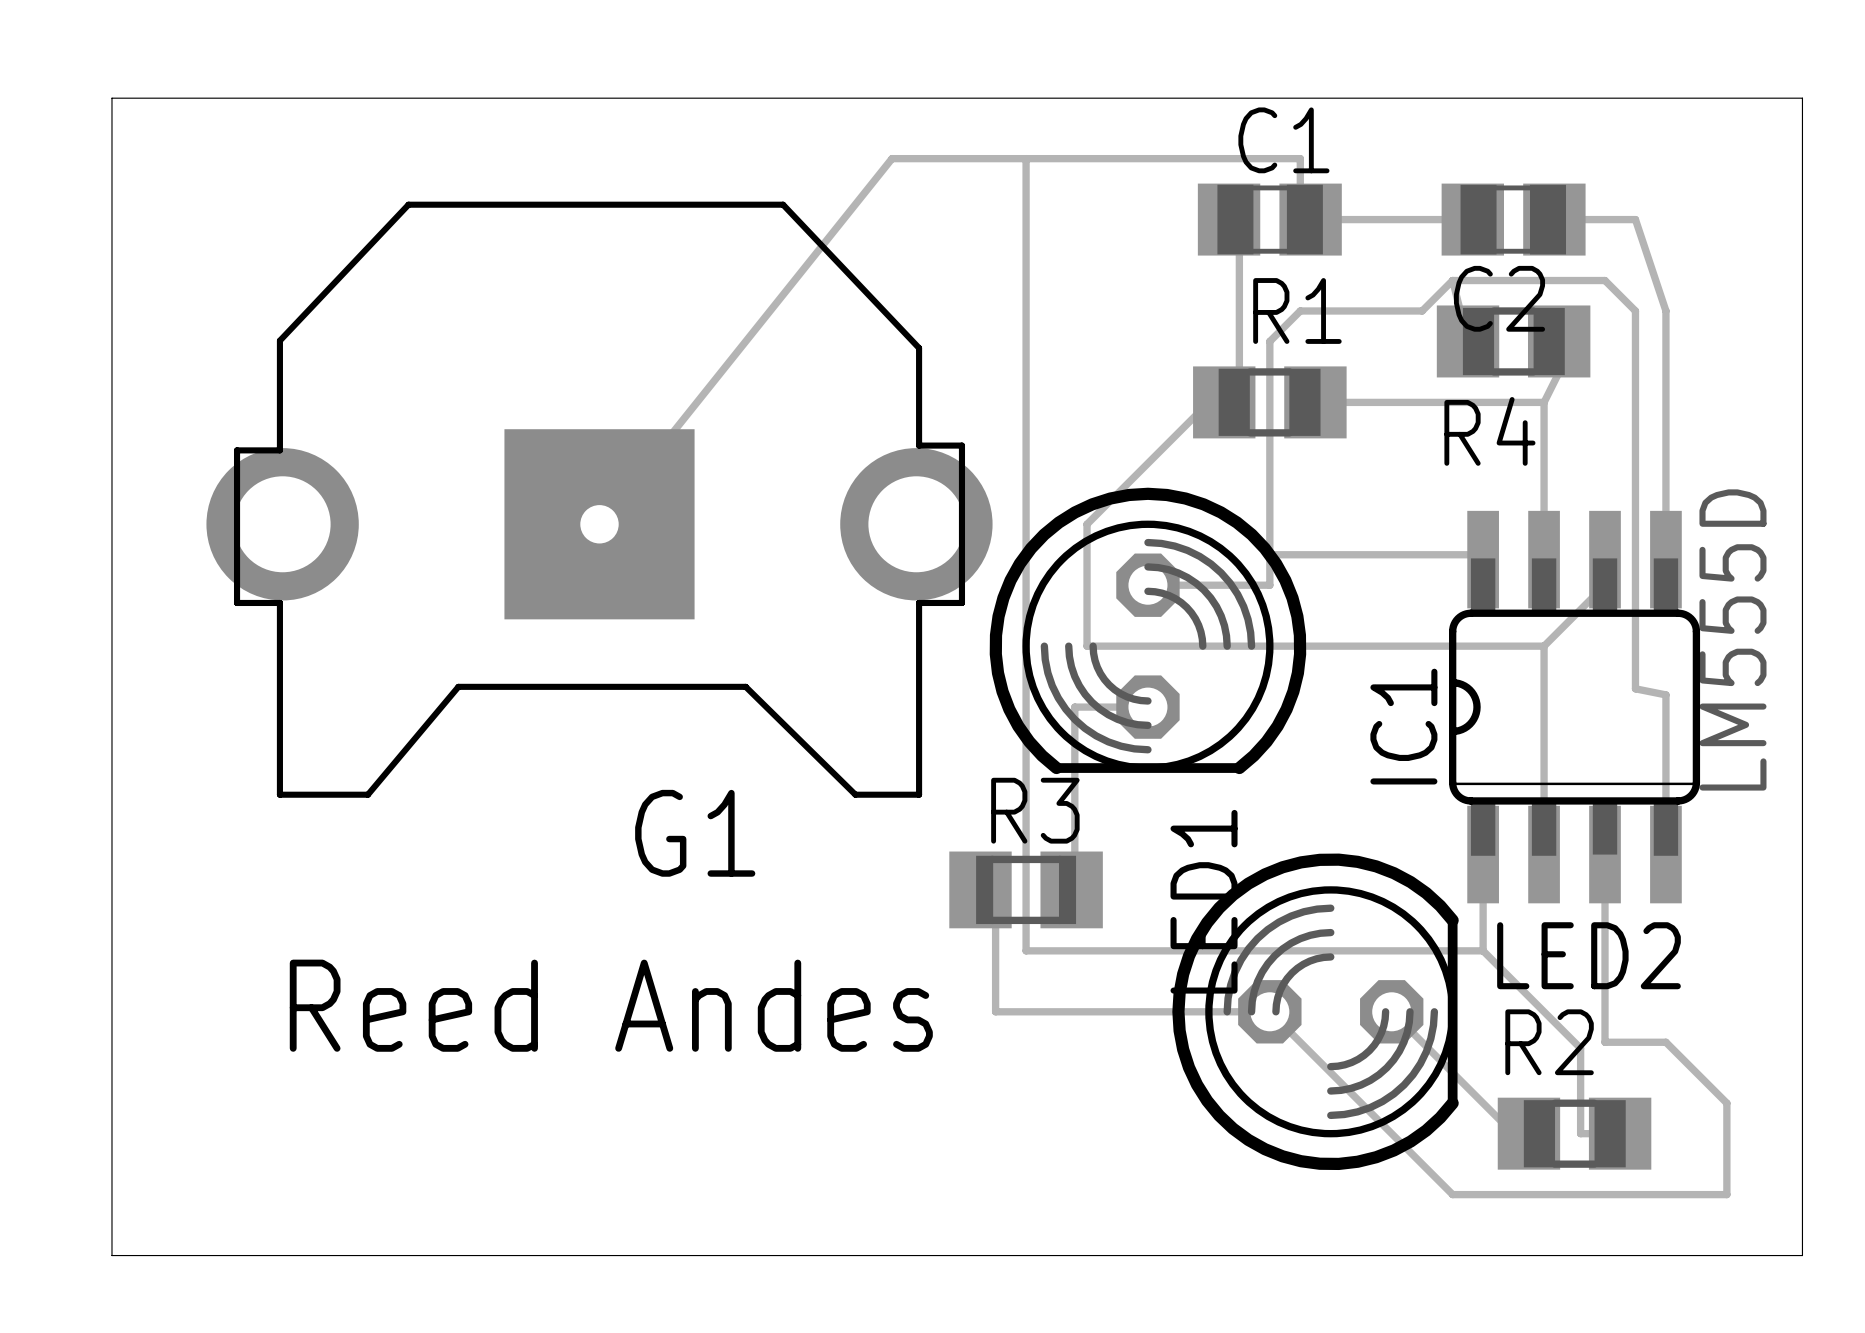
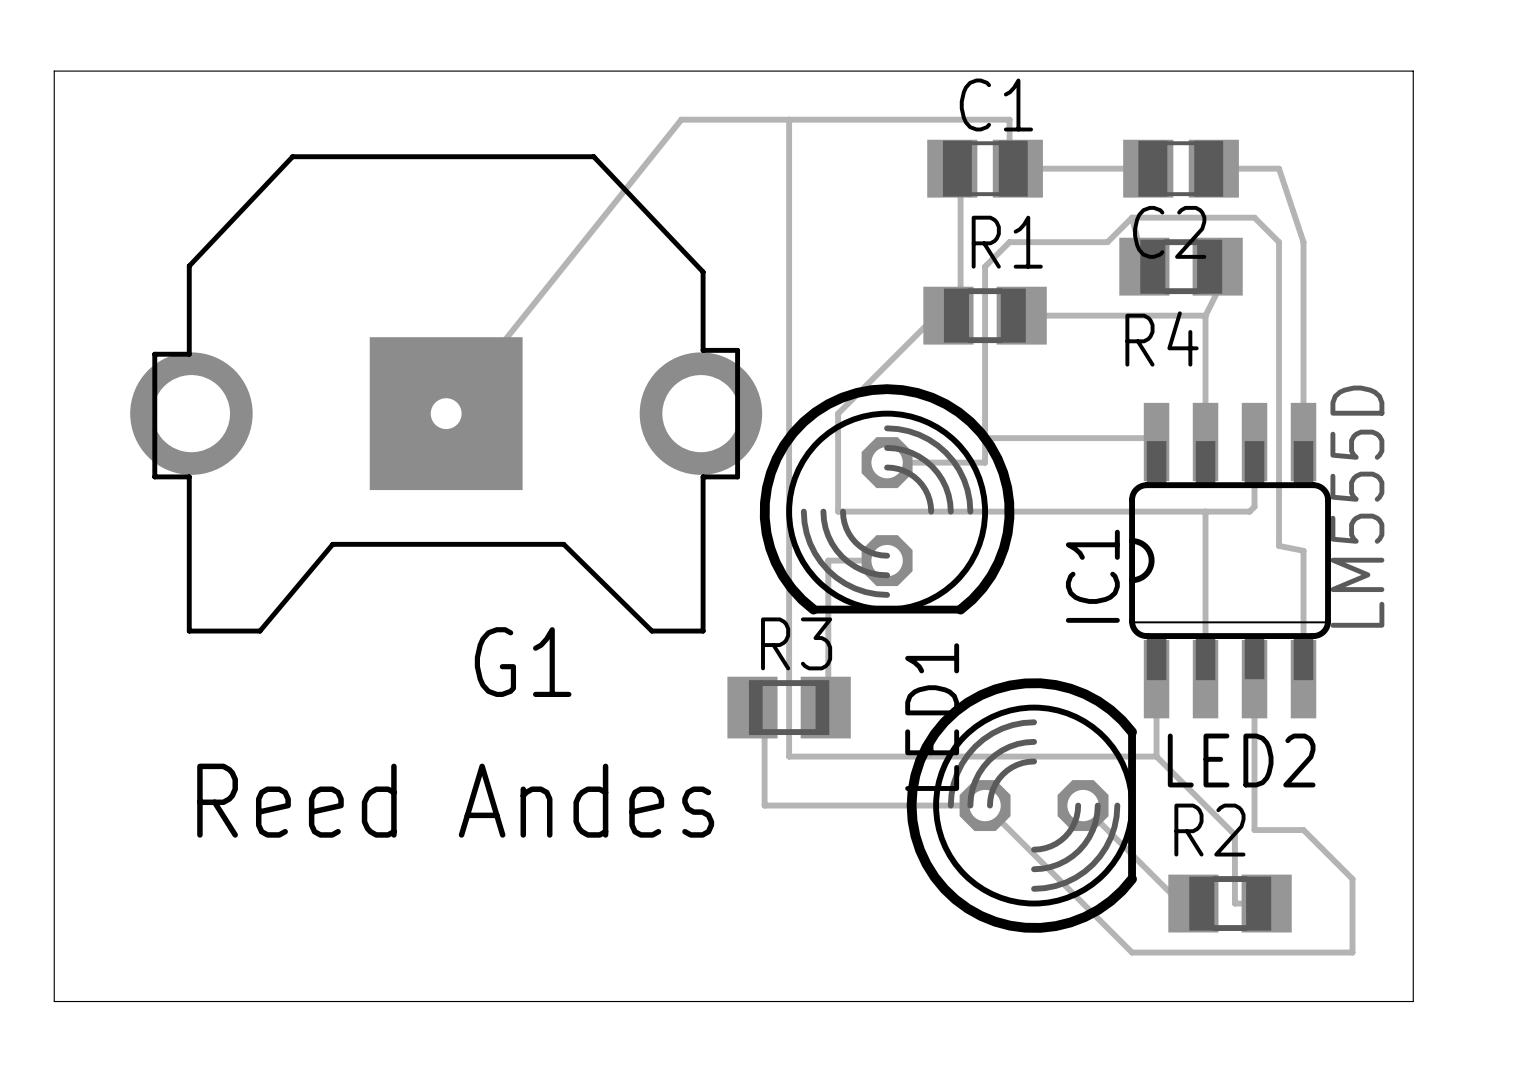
track: (1605, 585) (1544, 646) -> (1254, 462) (1254, 506) (1249, 511) (1205, 511)

